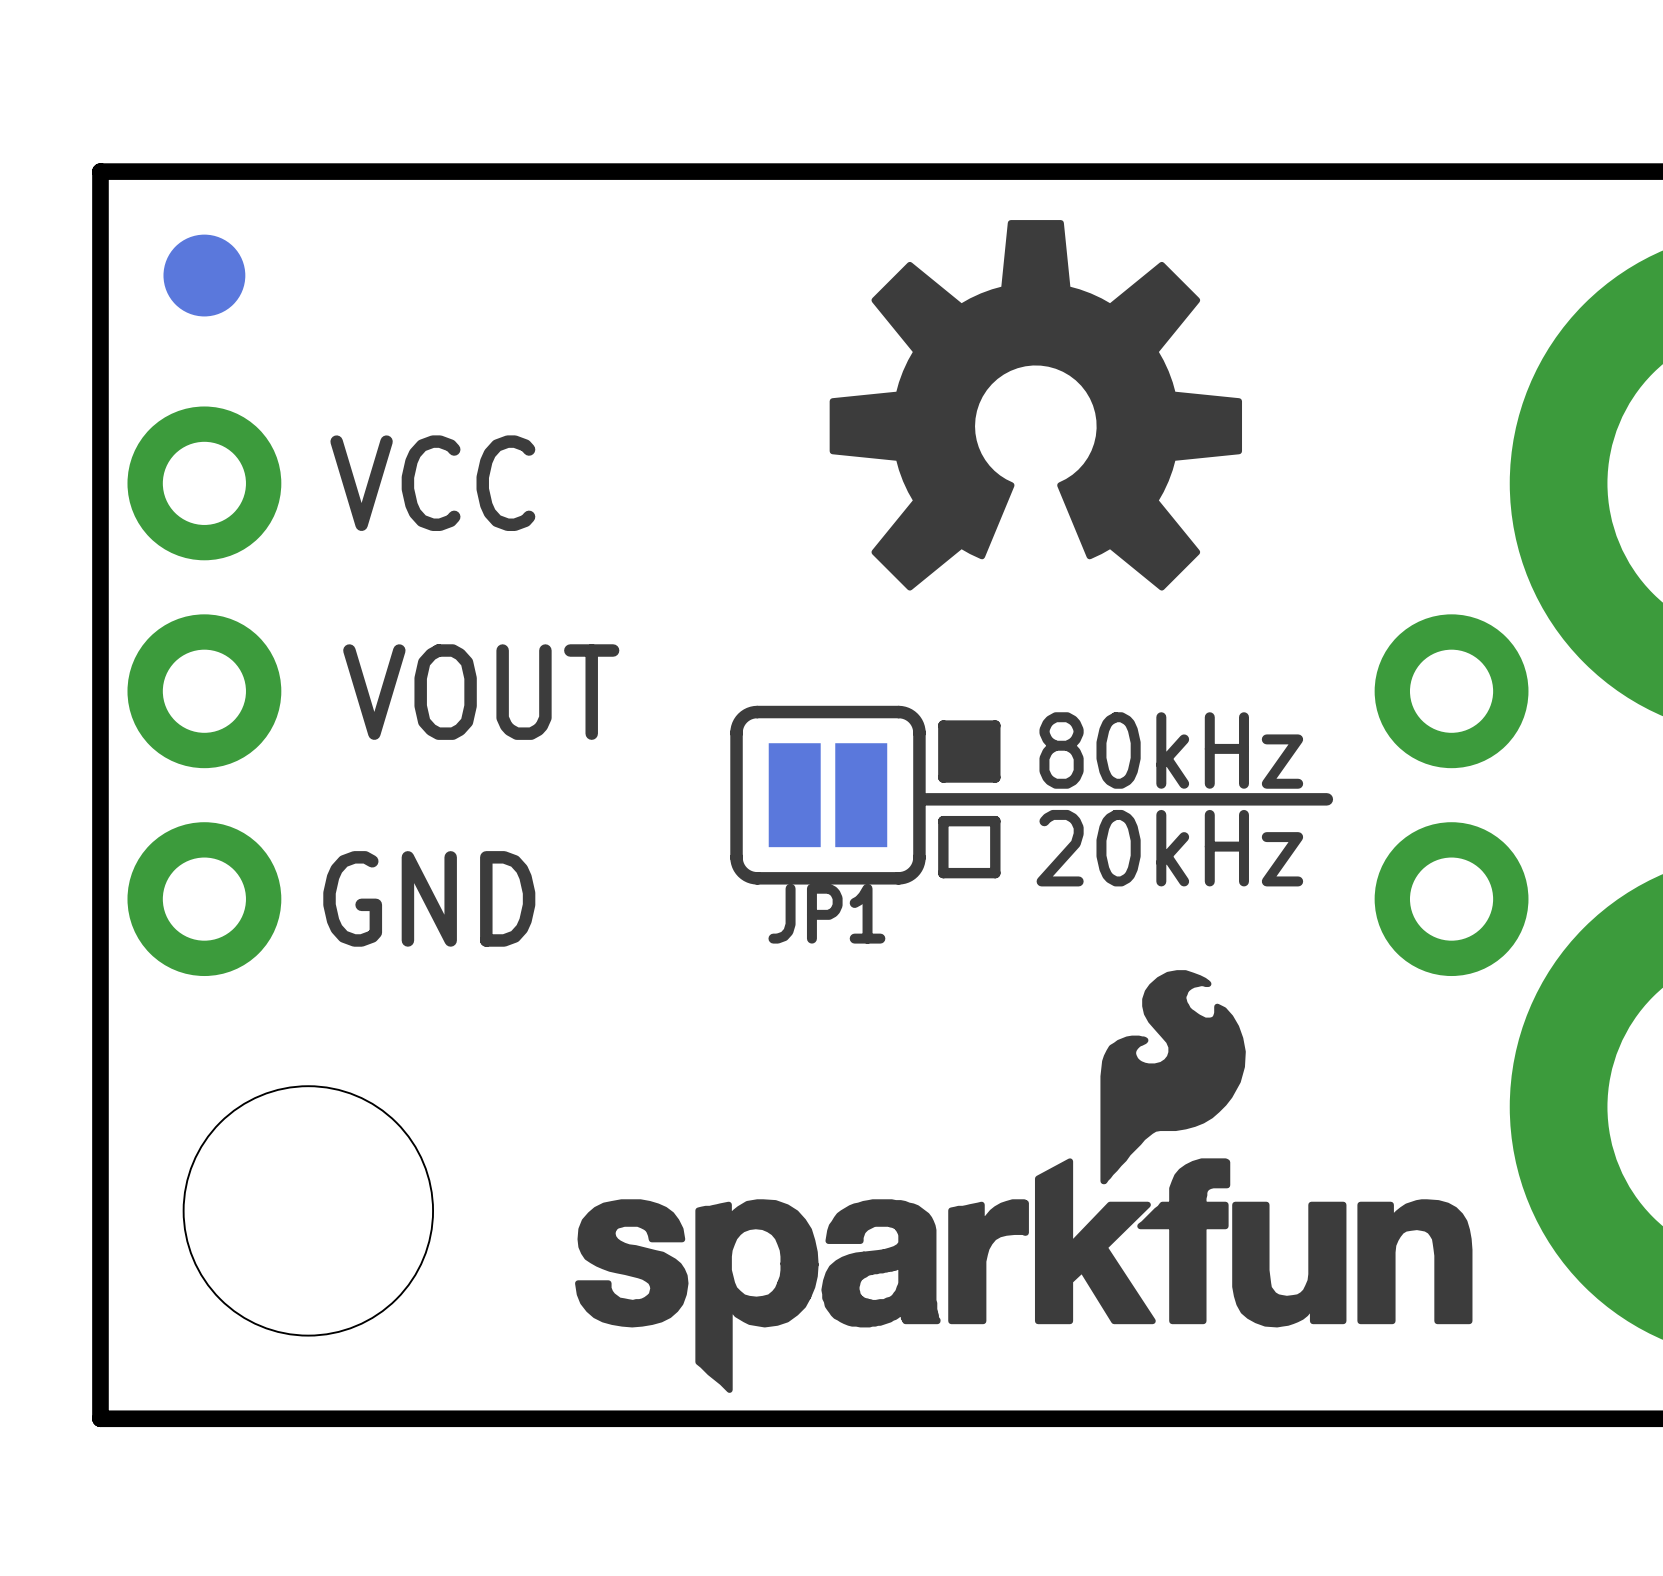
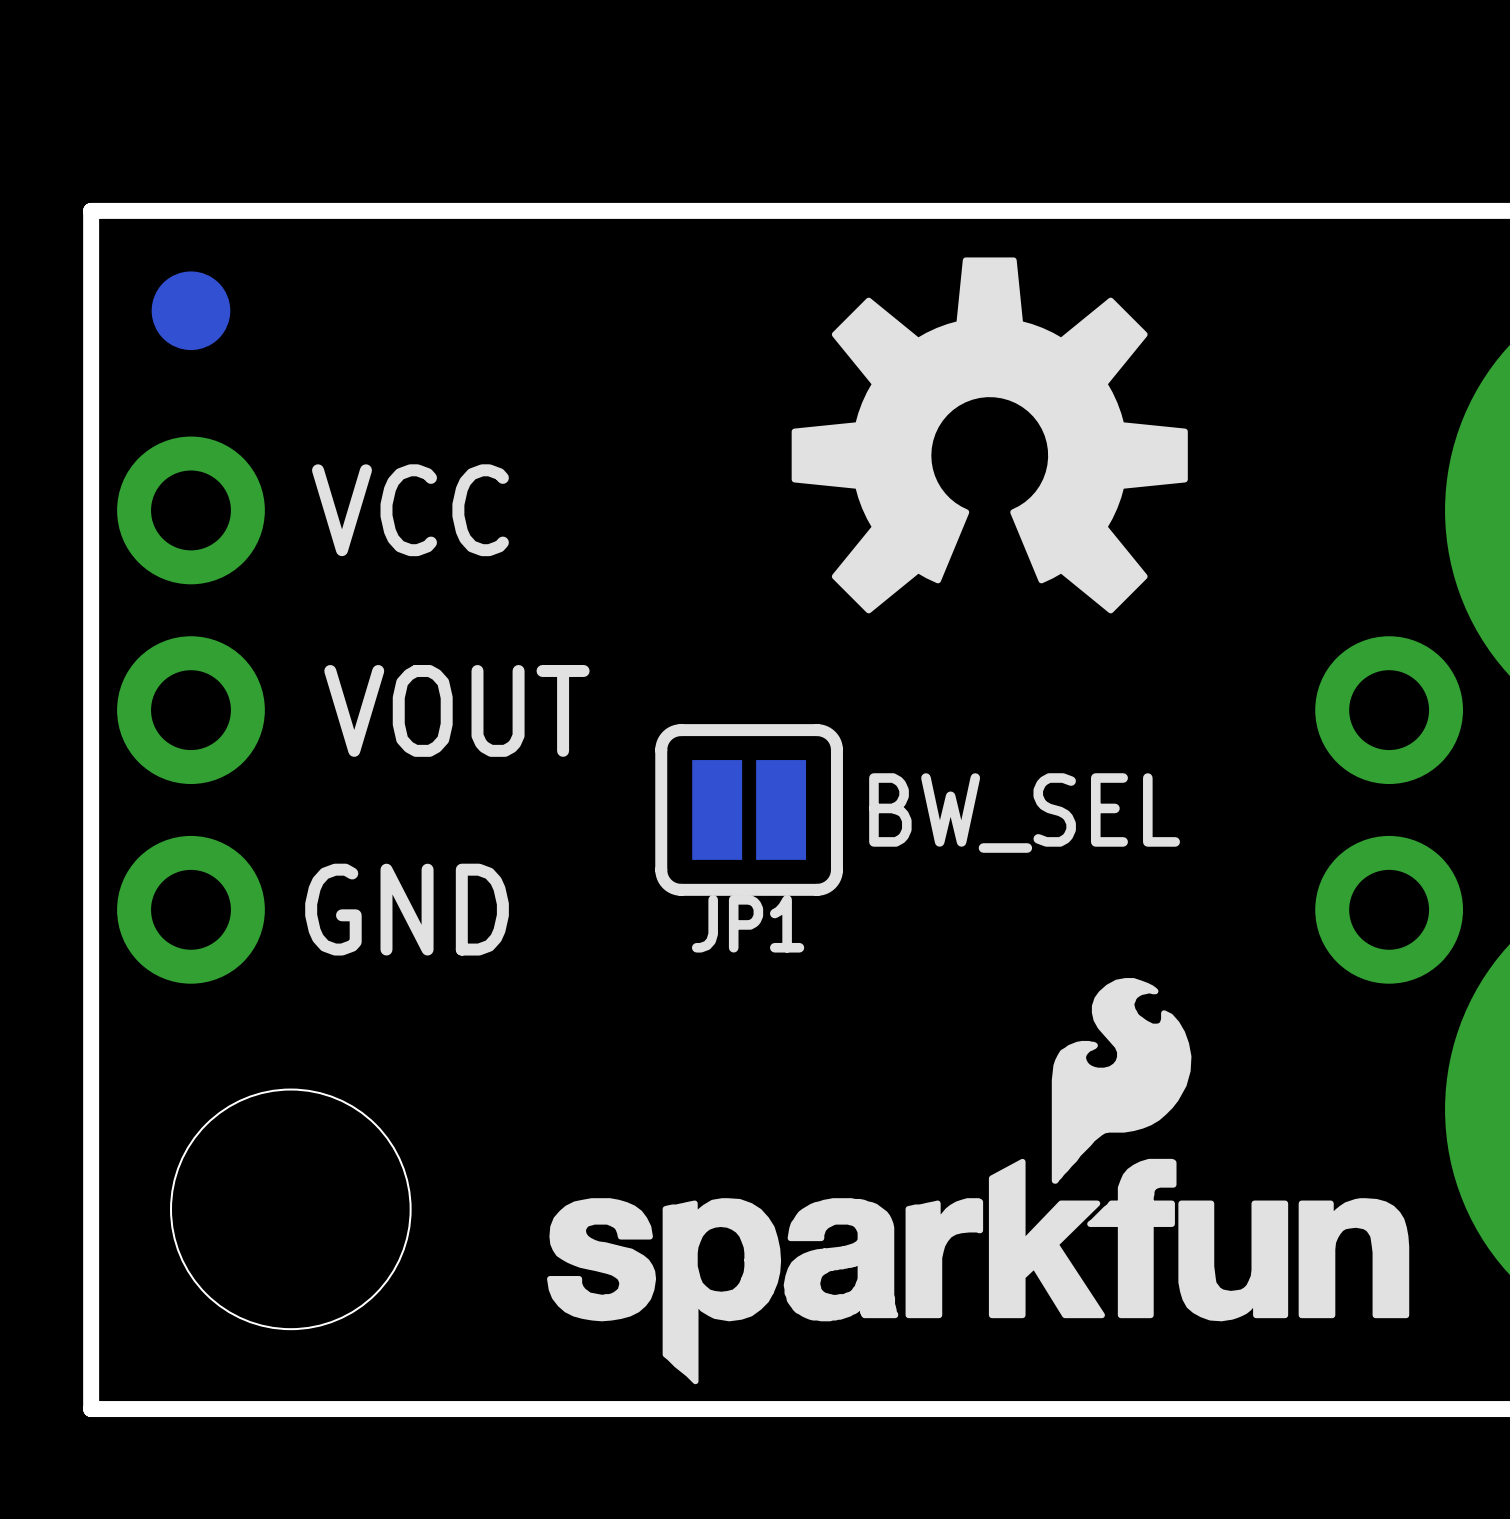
line: (995, 725) (995, 777) (943, 777) (943, 725) (995, 725) -> none
drawing: [946, 728, 993, 775] -> none
text: 80kHz (1171, 750) -> none
JP1 position: (827, 795) -> (749, 809)
text: none -> BW_SEL (1024, 813)
line: (1326, 799) (926, 799) -> none
line: (995, 821) (943, 821) (943, 873) (995, 873) (995, 821) -> none
text: 20kHz (1169, 848) -> none

